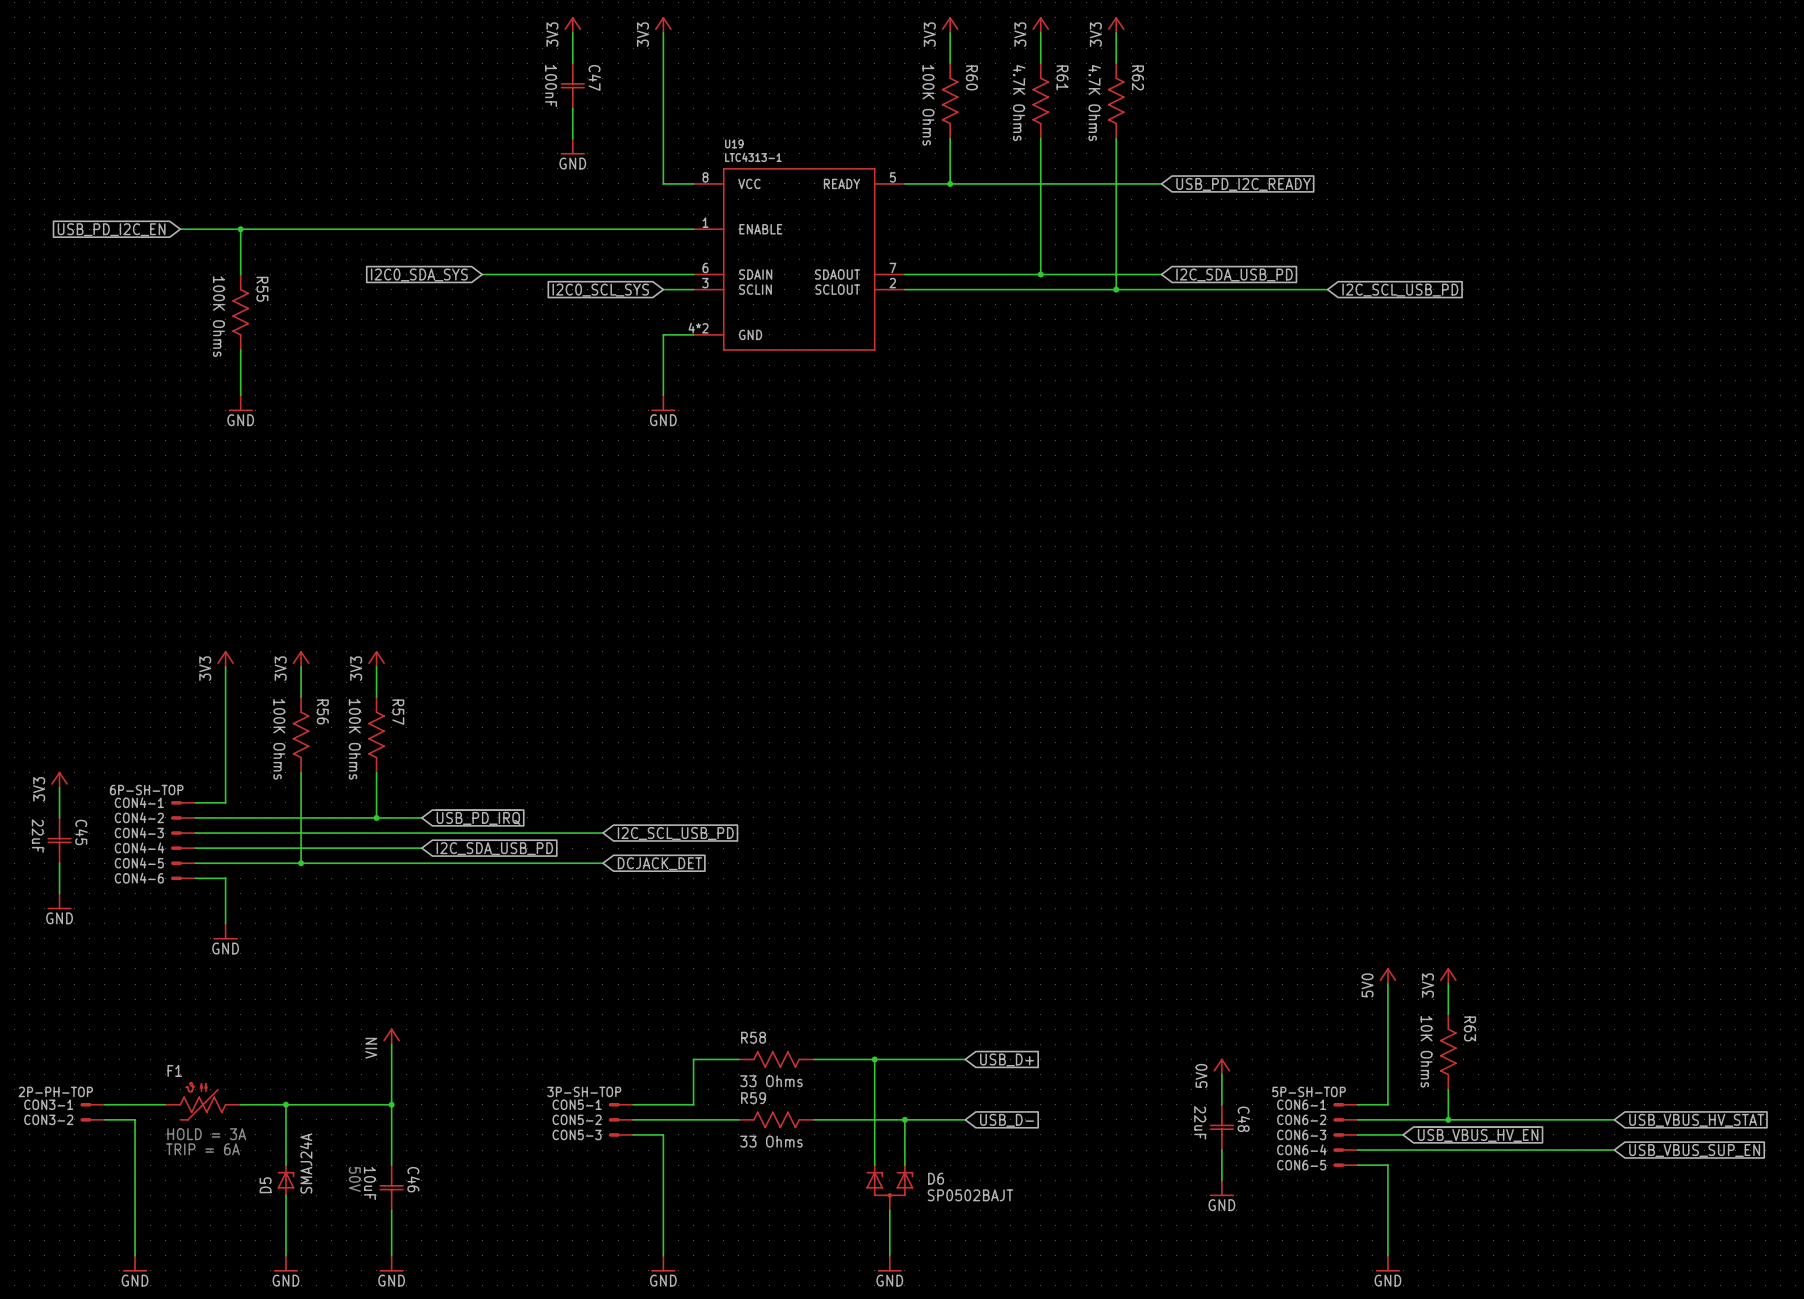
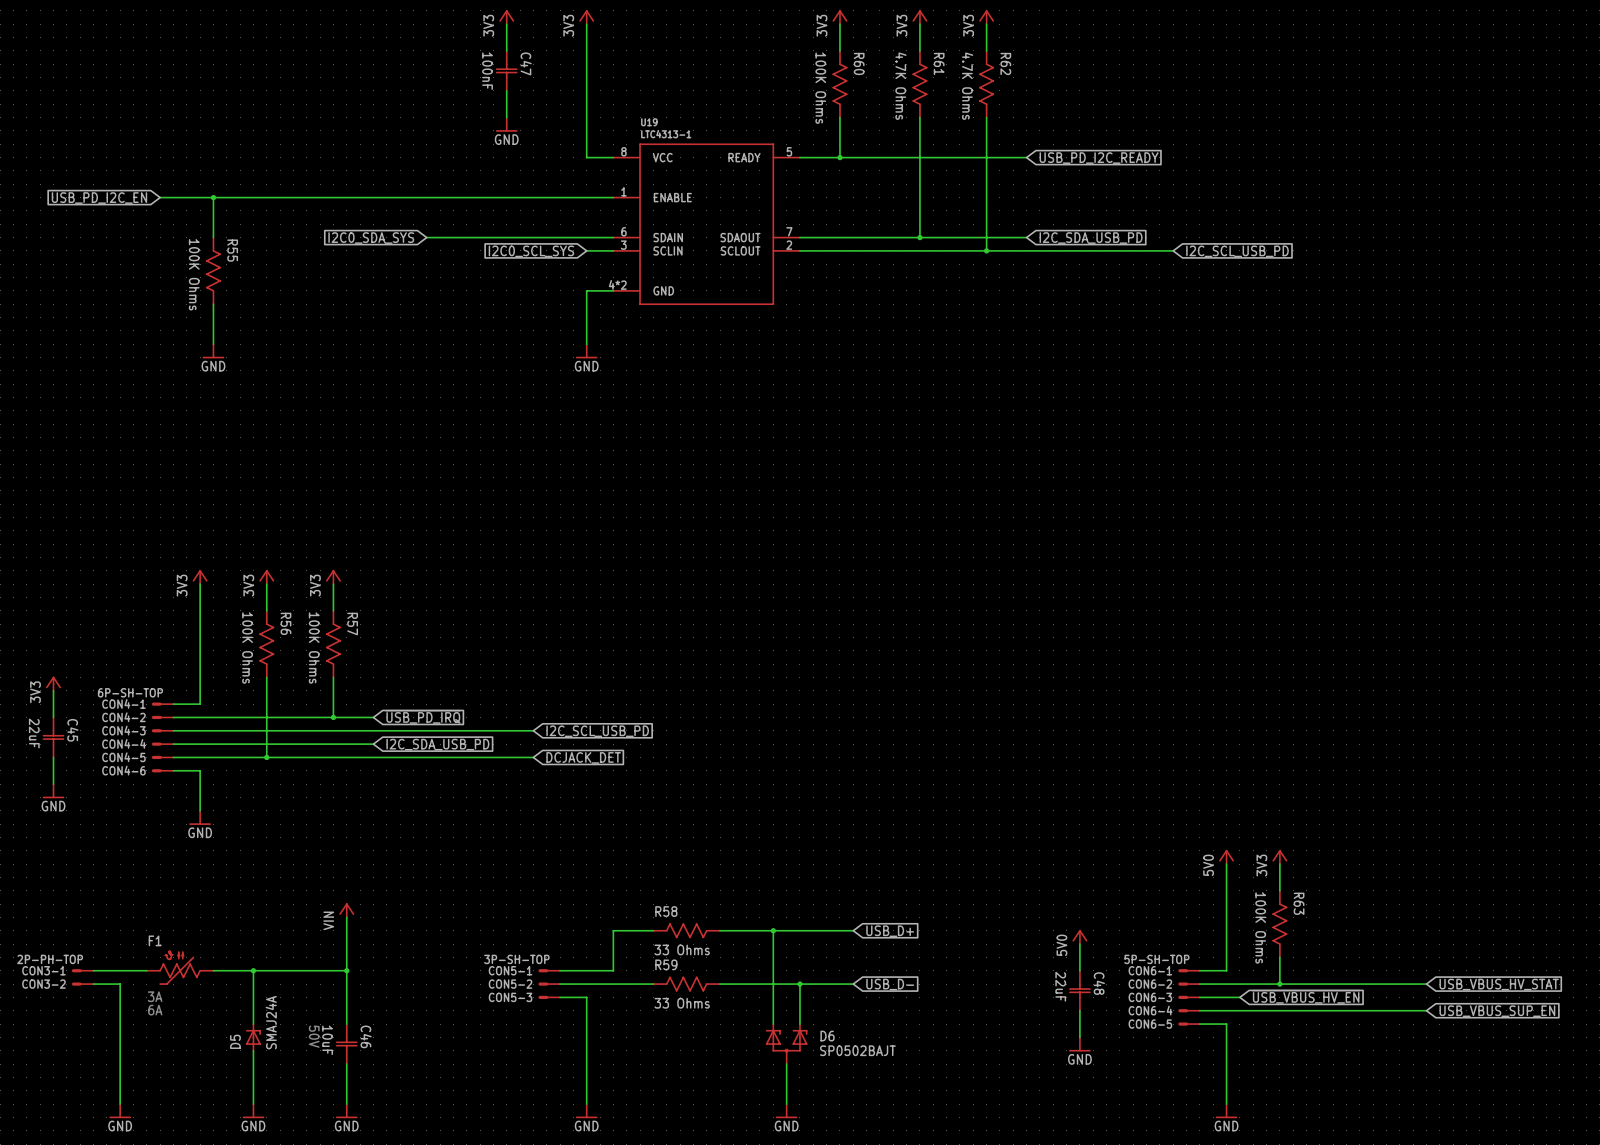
R63 value: 10K Ohms (1426, 1051) -> 100K Ohms (1260, 927)
F1 text: HOLD = 3A (206, 1134) -> 3A (155, 996)
F1 text: TRIP = 6A (202, 1149) -> 6A (155, 1010)

